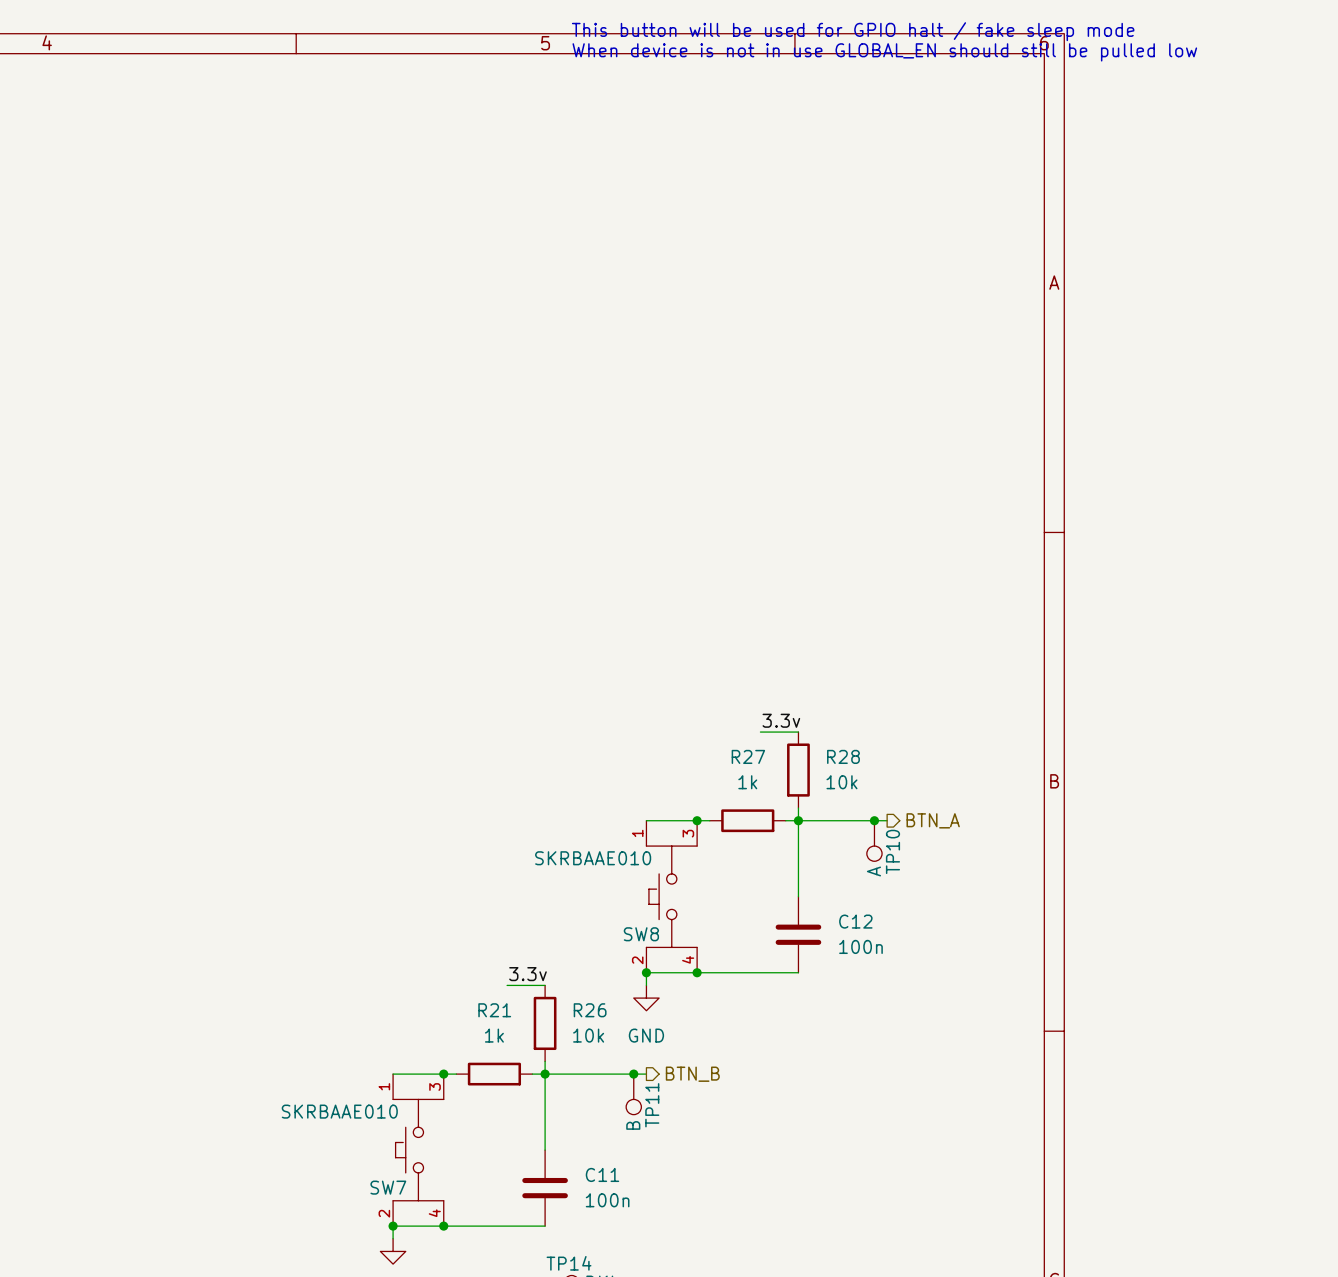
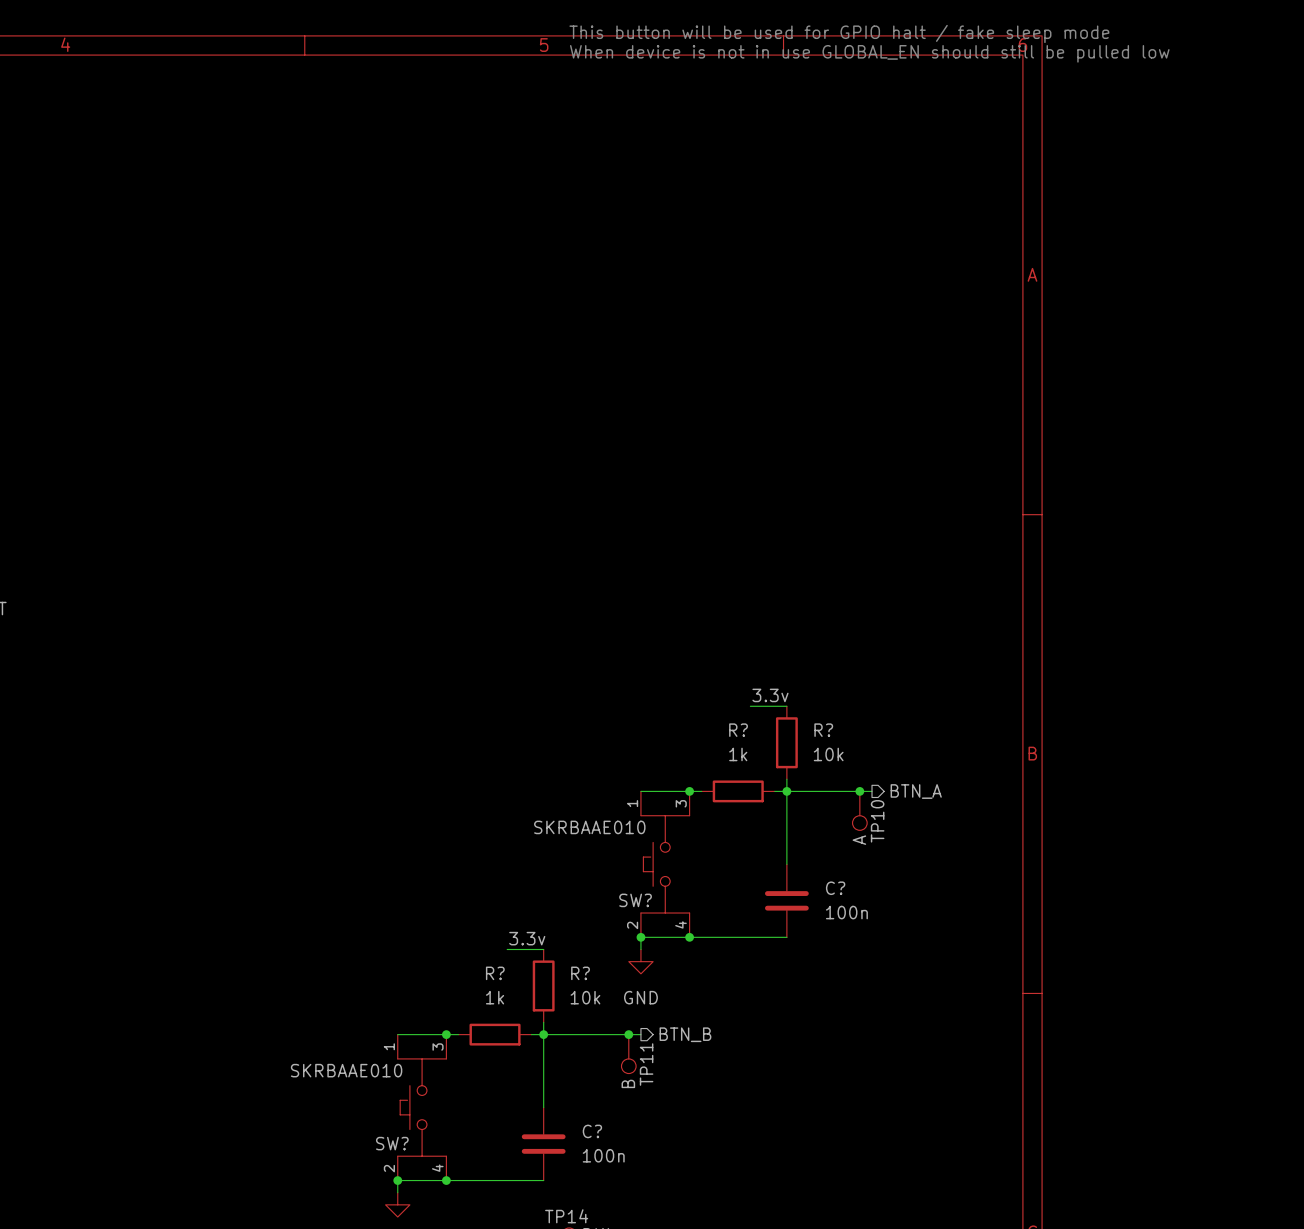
R27 name: R27 (748, 756) -> R? (738, 730)
R28 name: R28 (843, 756) -> R? (823, 730)
C12 name: C12 (855, 921) -> C? (835, 888)
SW8 name: SW8 (641, 934) -> SW? (635, 900)
R21 name: R21 (494, 1010) -> R? (495, 973)
R26 name: R26 (590, 1010) -> R? (580, 973)
C11 name: C11 (602, 1174) -> C? (592, 1131)
SW7 name: SW7 (388, 1187) -> SW? (392, 1143)

